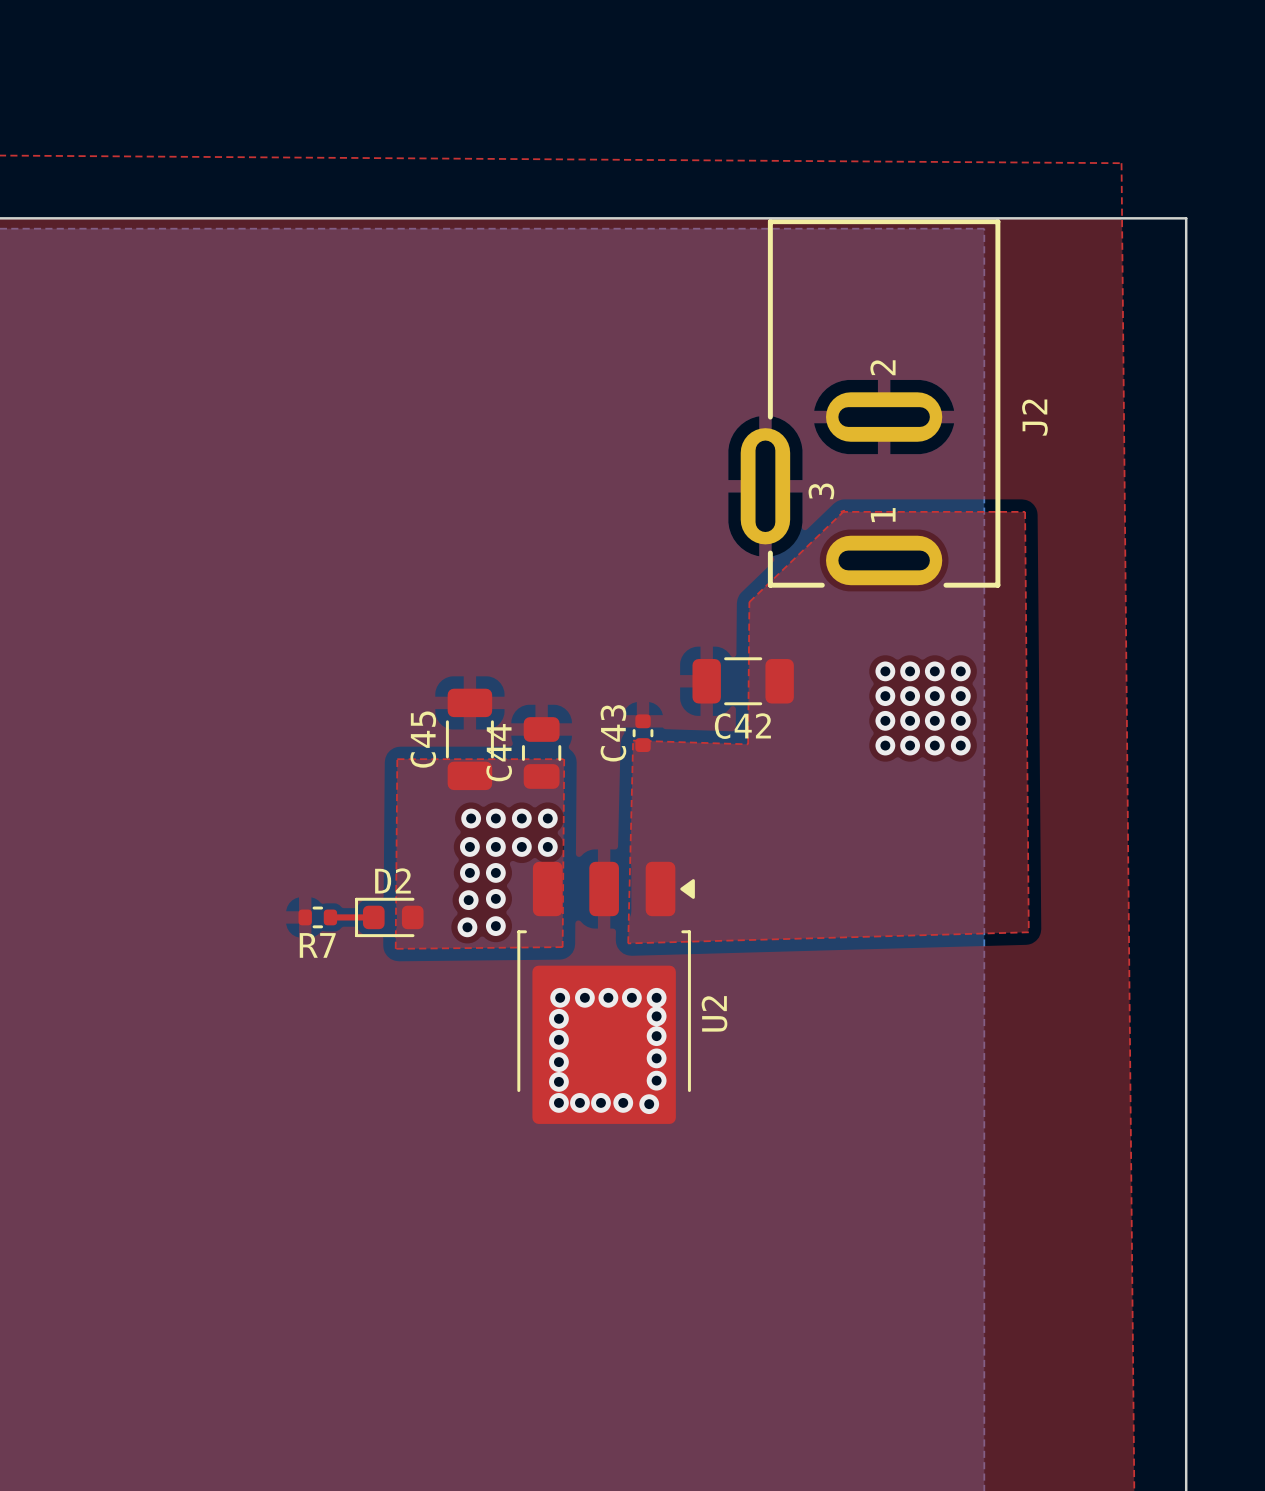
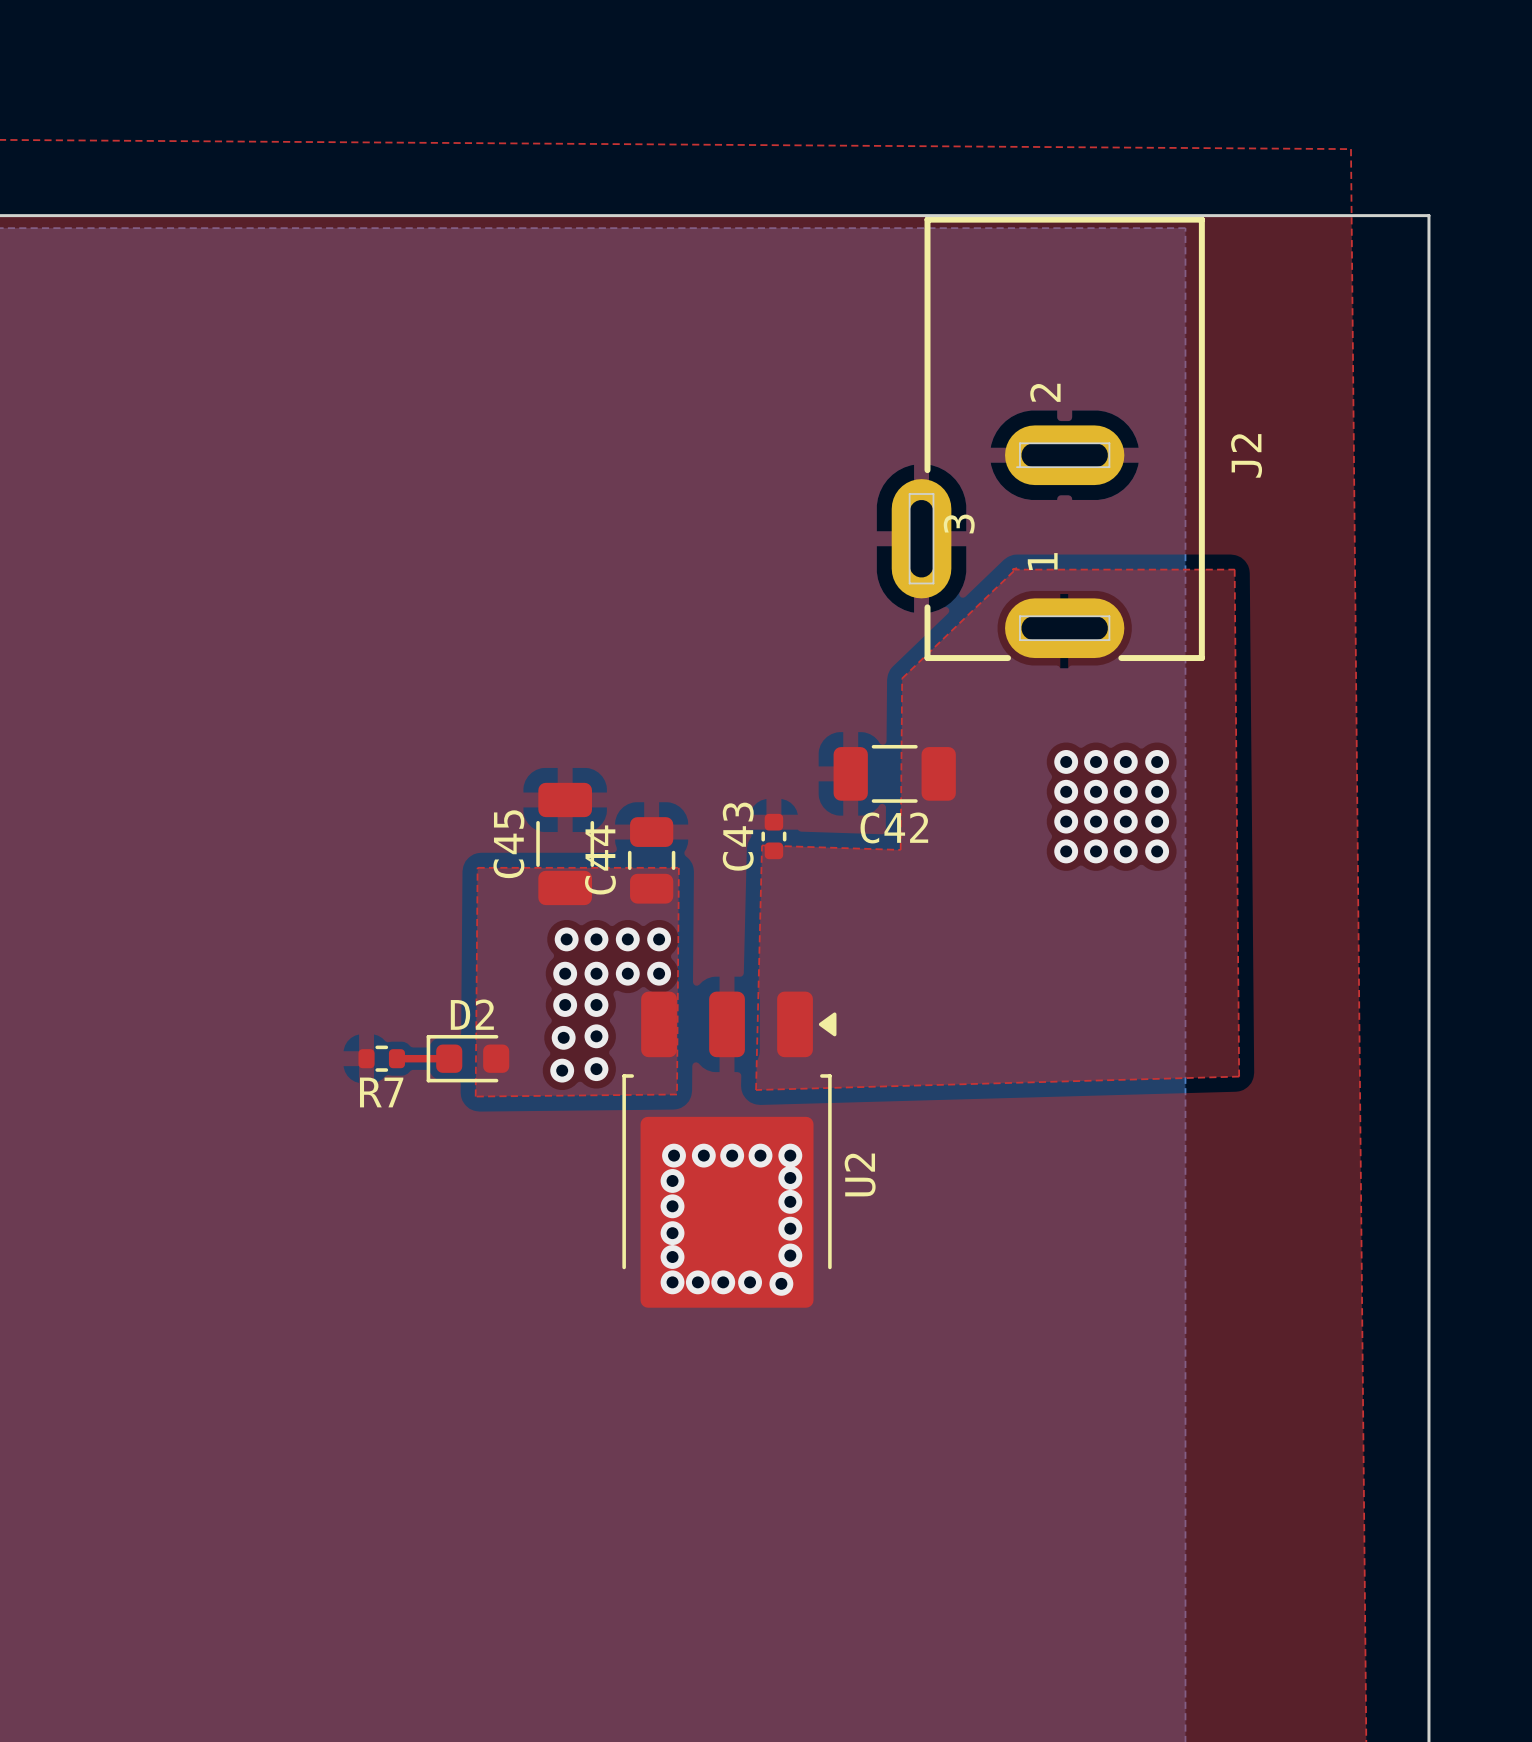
J2 footprint: [740, 219, 1001, 588] -> [891, 216, 1205, 662]

